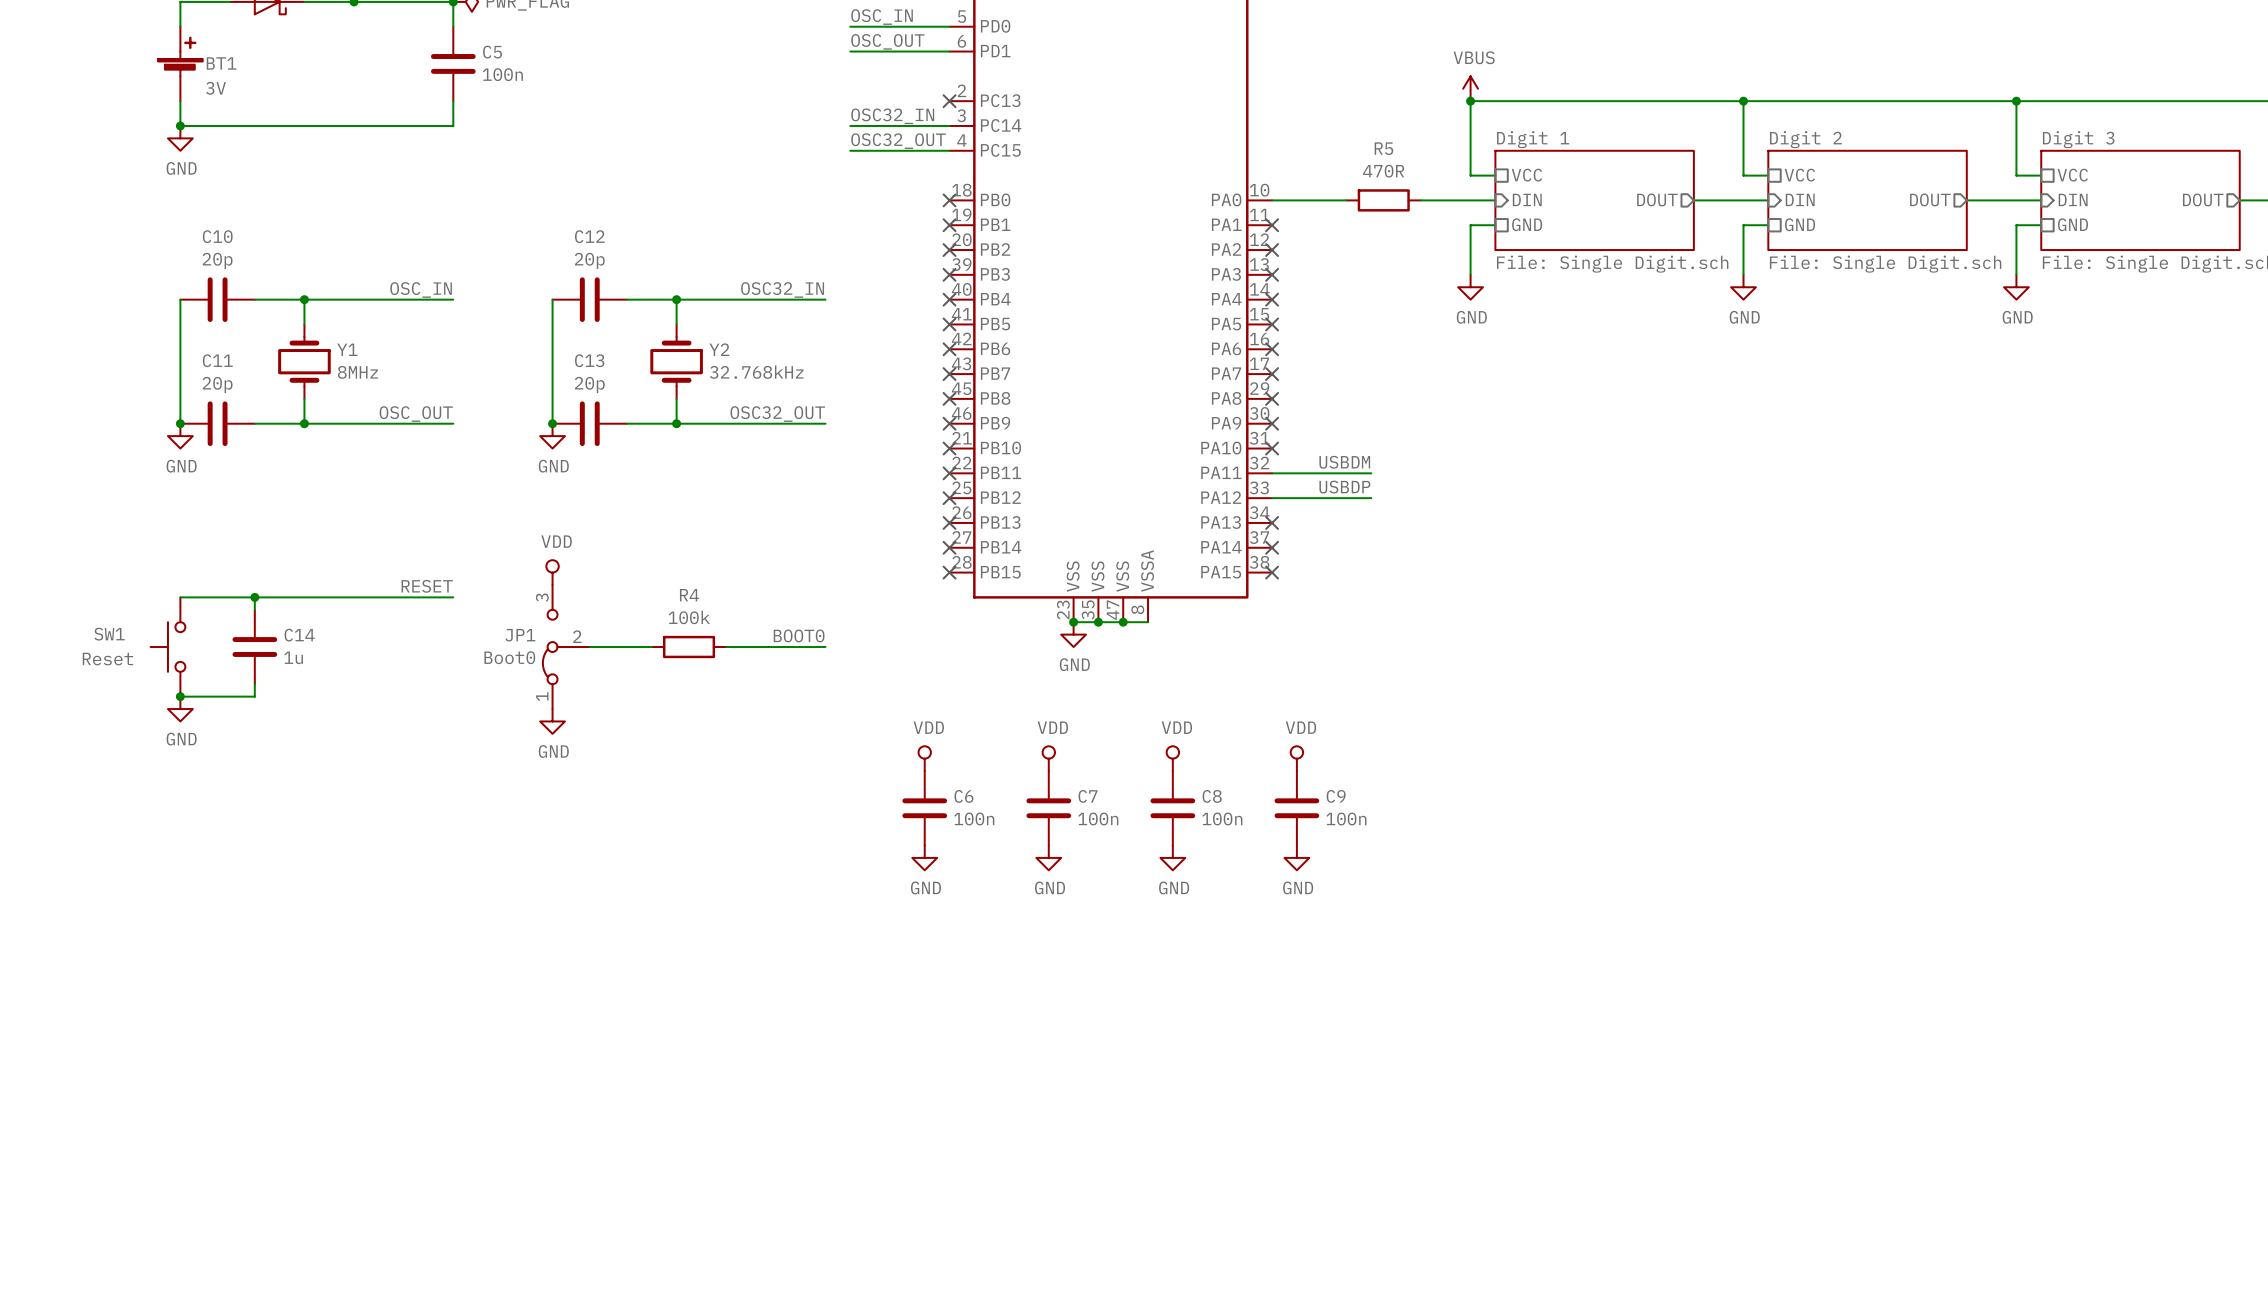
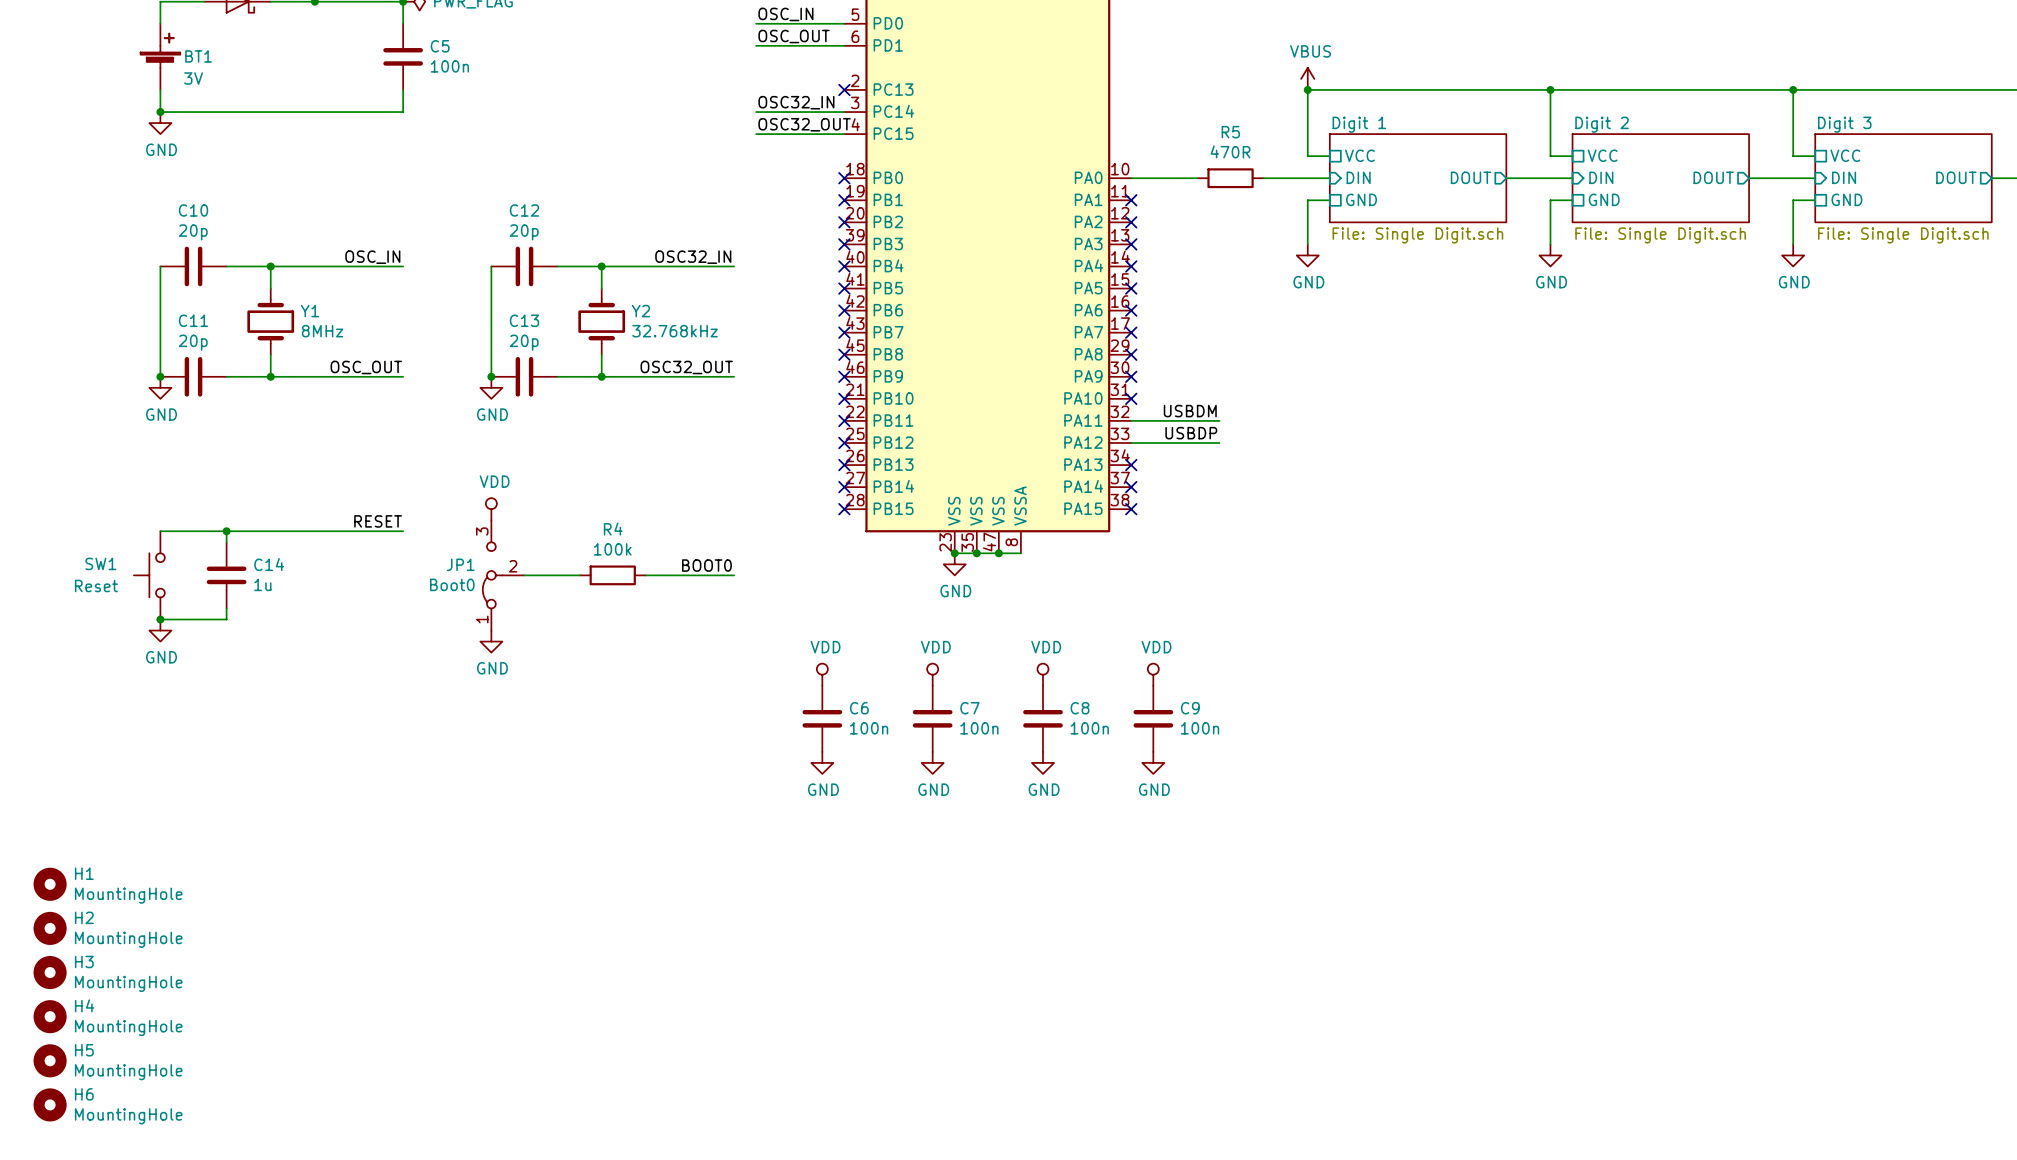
H1: none -> MountingHole (50, 884)
H2: none -> MountingHole (50, 928)
H3: none -> MountingHole (50, 972)
H4: none -> MountingHole (50, 1016)
H5: none -> MountingHole (50, 1060)
H6: none -> MountingHole (50, 1104)

